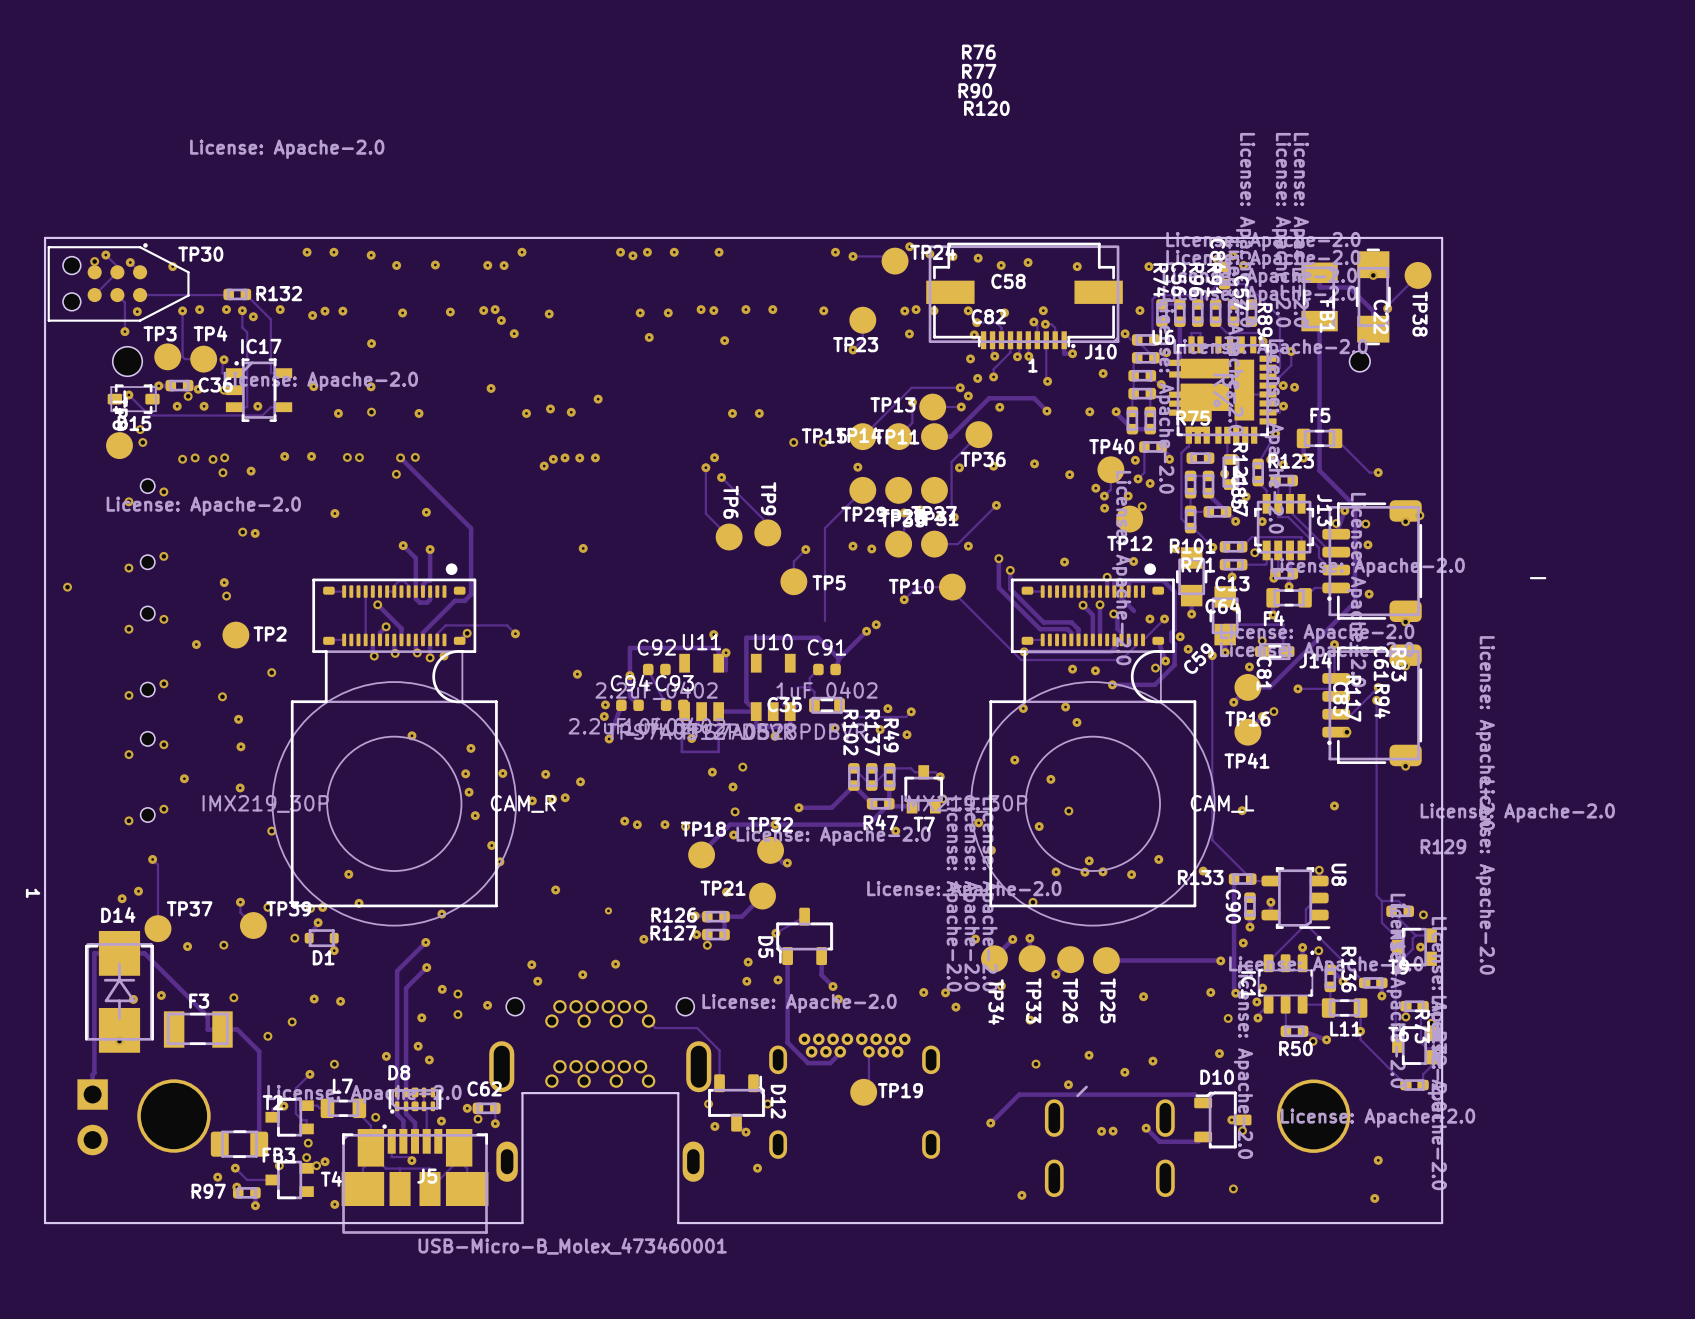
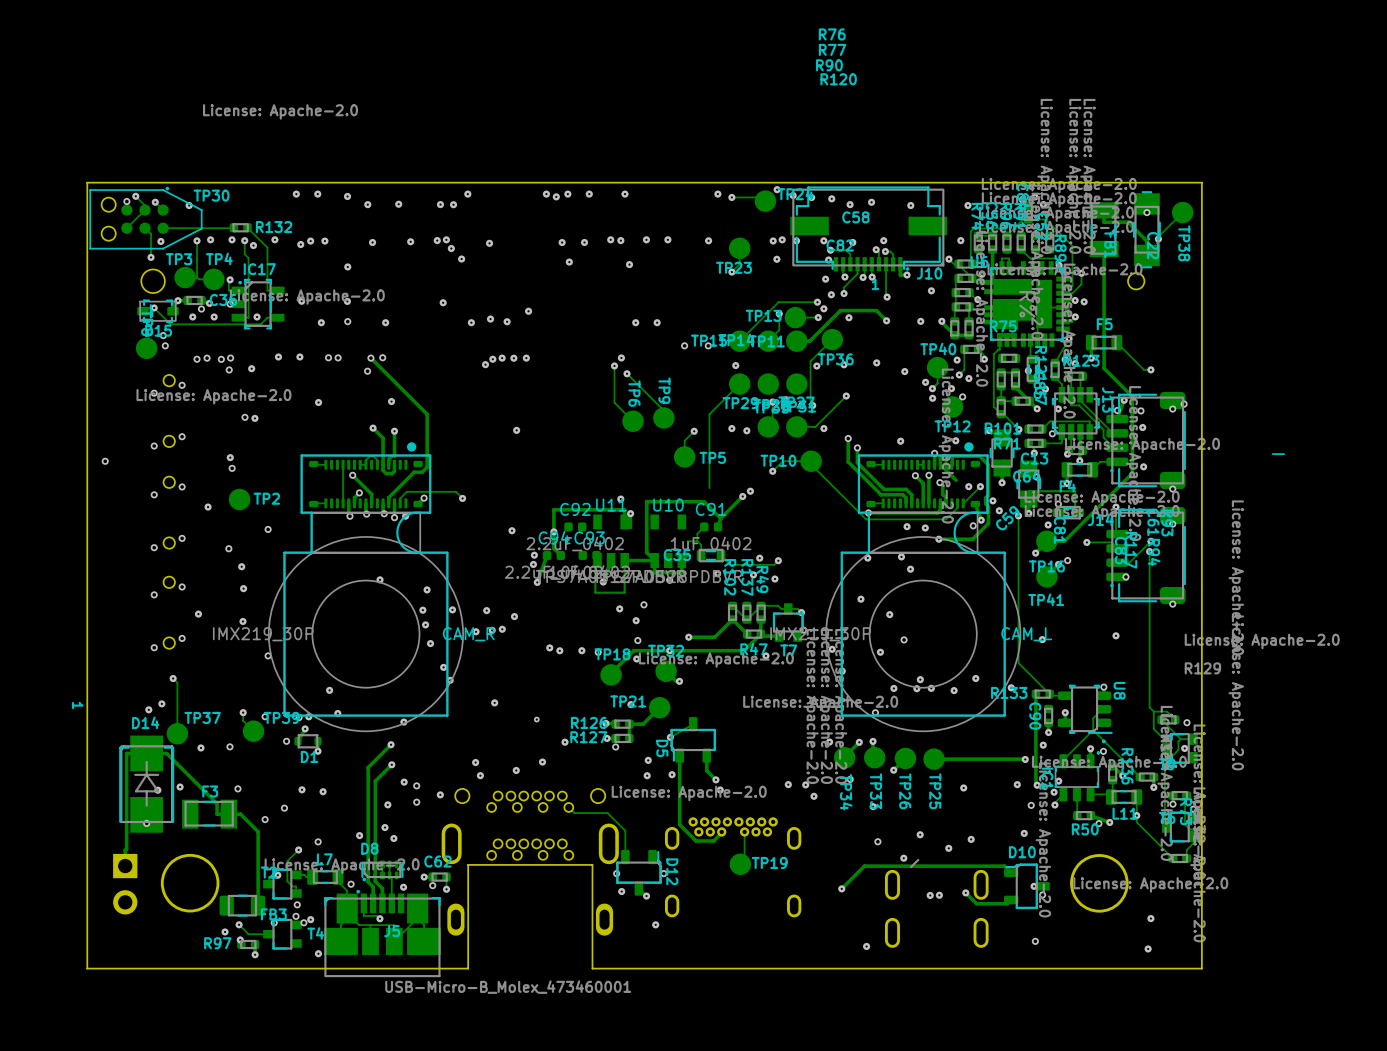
track: (648, 669) (666, 705) -> none

